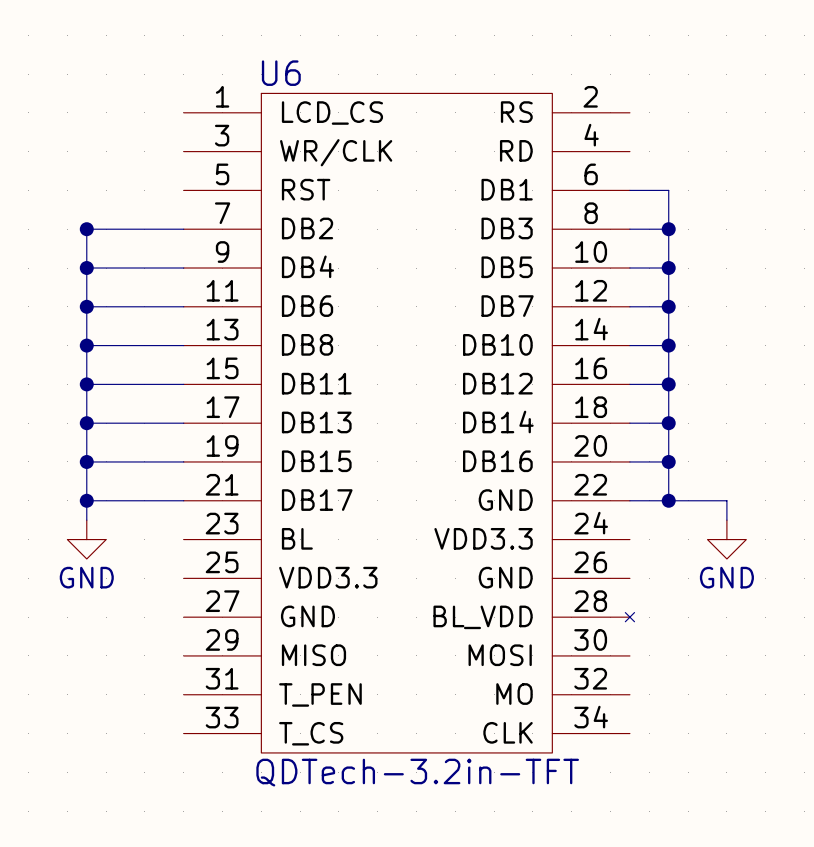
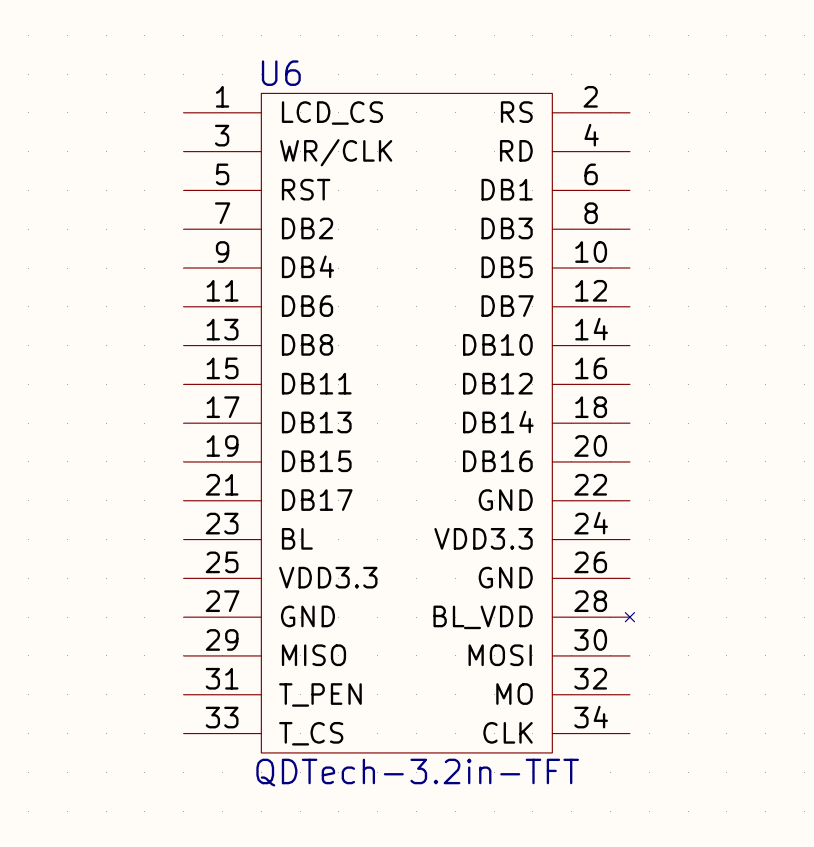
wire: (629, 190) (668, 190) (668, 500) -> none
junction: (86, 229) -> none
wire: (183, 229) (86, 229) (86, 520) -> none
wire: (629, 229) (668, 229) -> none
junction: (668, 229) -> none
wire: (86, 268) (183, 268) -> none
junction: (86, 268) -> none
wire: (629, 268) (668, 268) -> none
junction: (668, 268) -> none
wire: (86, 306) (183, 306) -> none
junction: (86, 306) -> none
wire: (629, 306) (668, 306) -> none
junction: (668, 306) -> none
wire: (86, 345) (183, 345) -> none
junction: (86, 345) -> none
wire: (629, 345) (668, 345) -> none
junction: (668, 345) -> none
wire: (86, 384) (183, 384) -> none
junction: (86, 384) -> none
wire: (629, 384) (668, 384) -> none
junction: (668, 384) -> none
wire: (86, 423) (183, 423) -> none
junction: (86, 423) -> none
wire: (629, 423) (668, 423) -> none
junction: (668, 423) -> none
wire: (86, 461) (183, 461) -> none
junction: (86, 461) -> none
wire: (629, 461) (668, 461) -> none
junction: (668, 461) -> none
wire: (86, 500) (183, 500) -> none
junction: (86, 500) -> none
wire: (629, 500) (726, 500) (726, 520) -> none
junction: (668, 500) -> none
power symbol: GND (86, 539) -> none
power symbol: GND (726, 539) -> none

